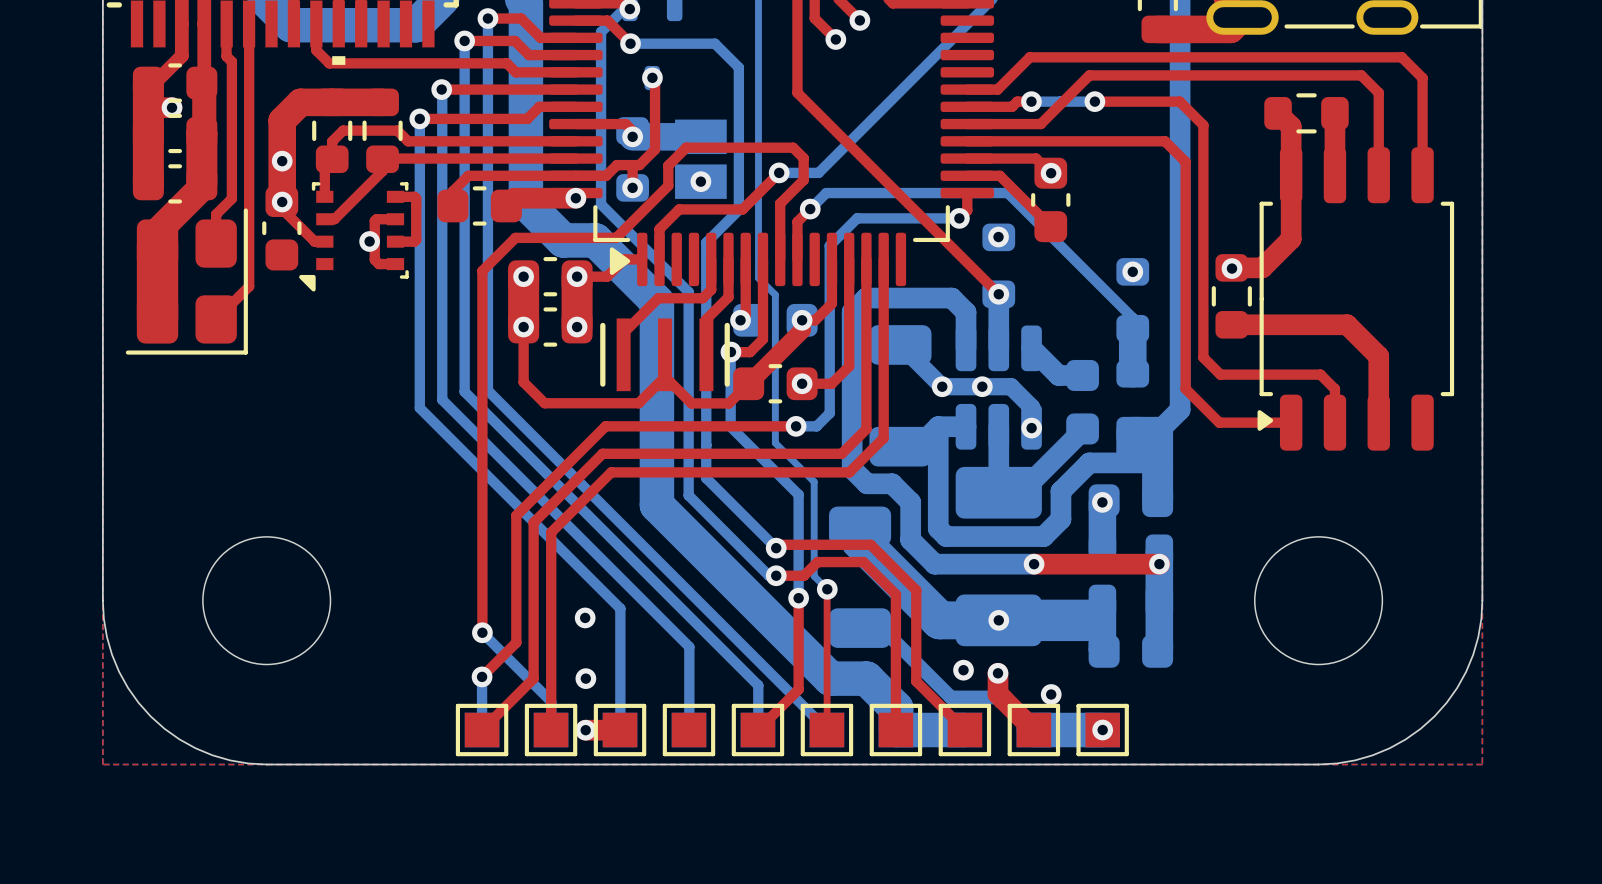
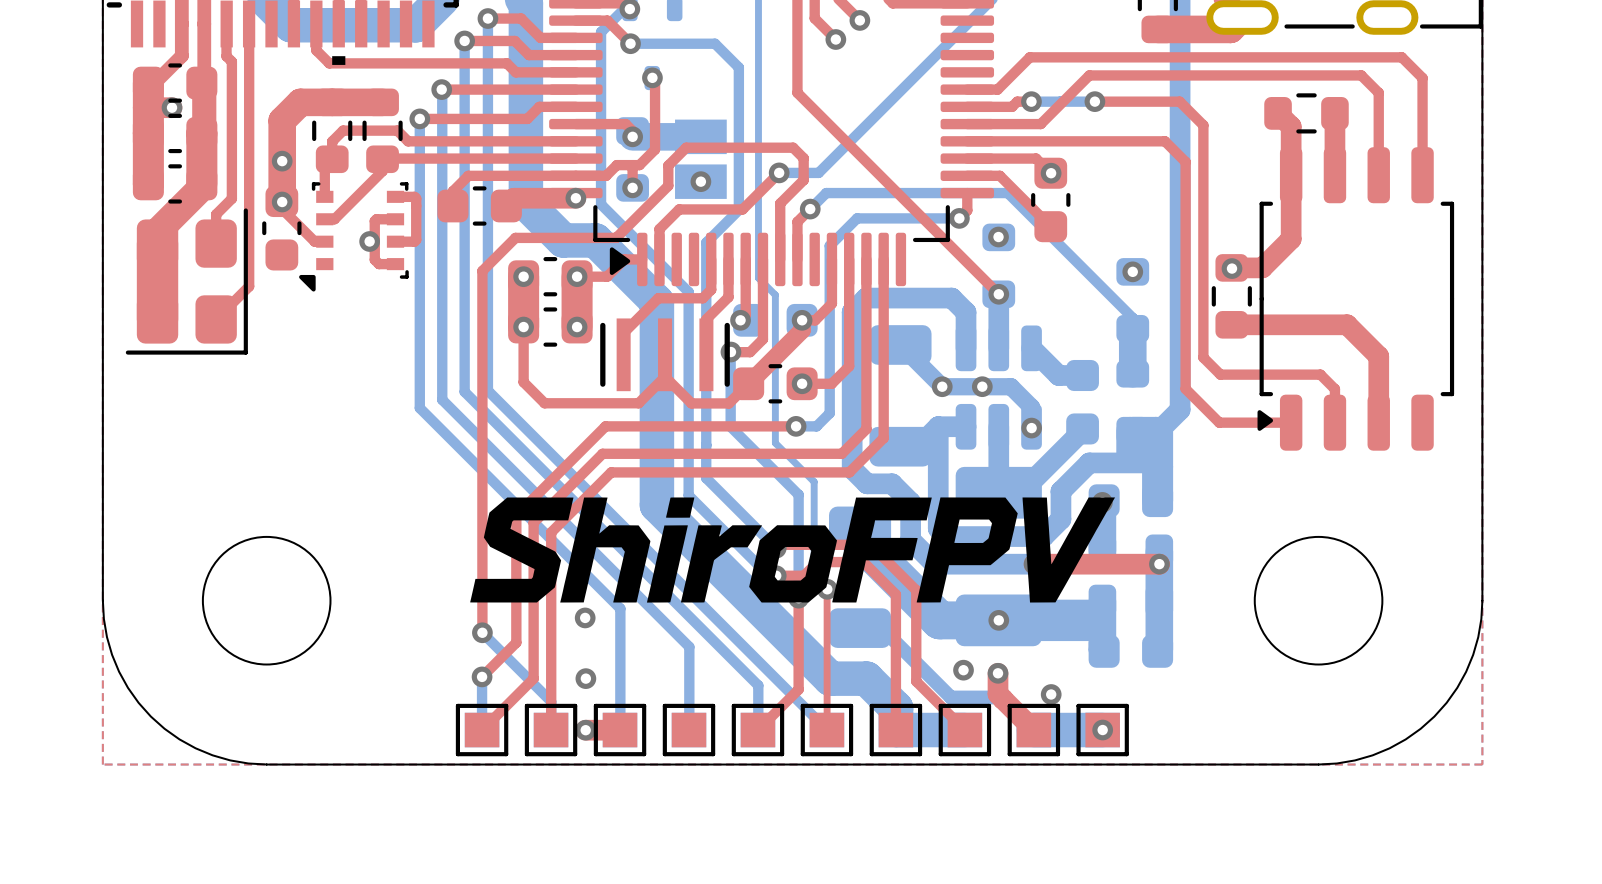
drawing: none -> [470, 497, 1116, 603]

